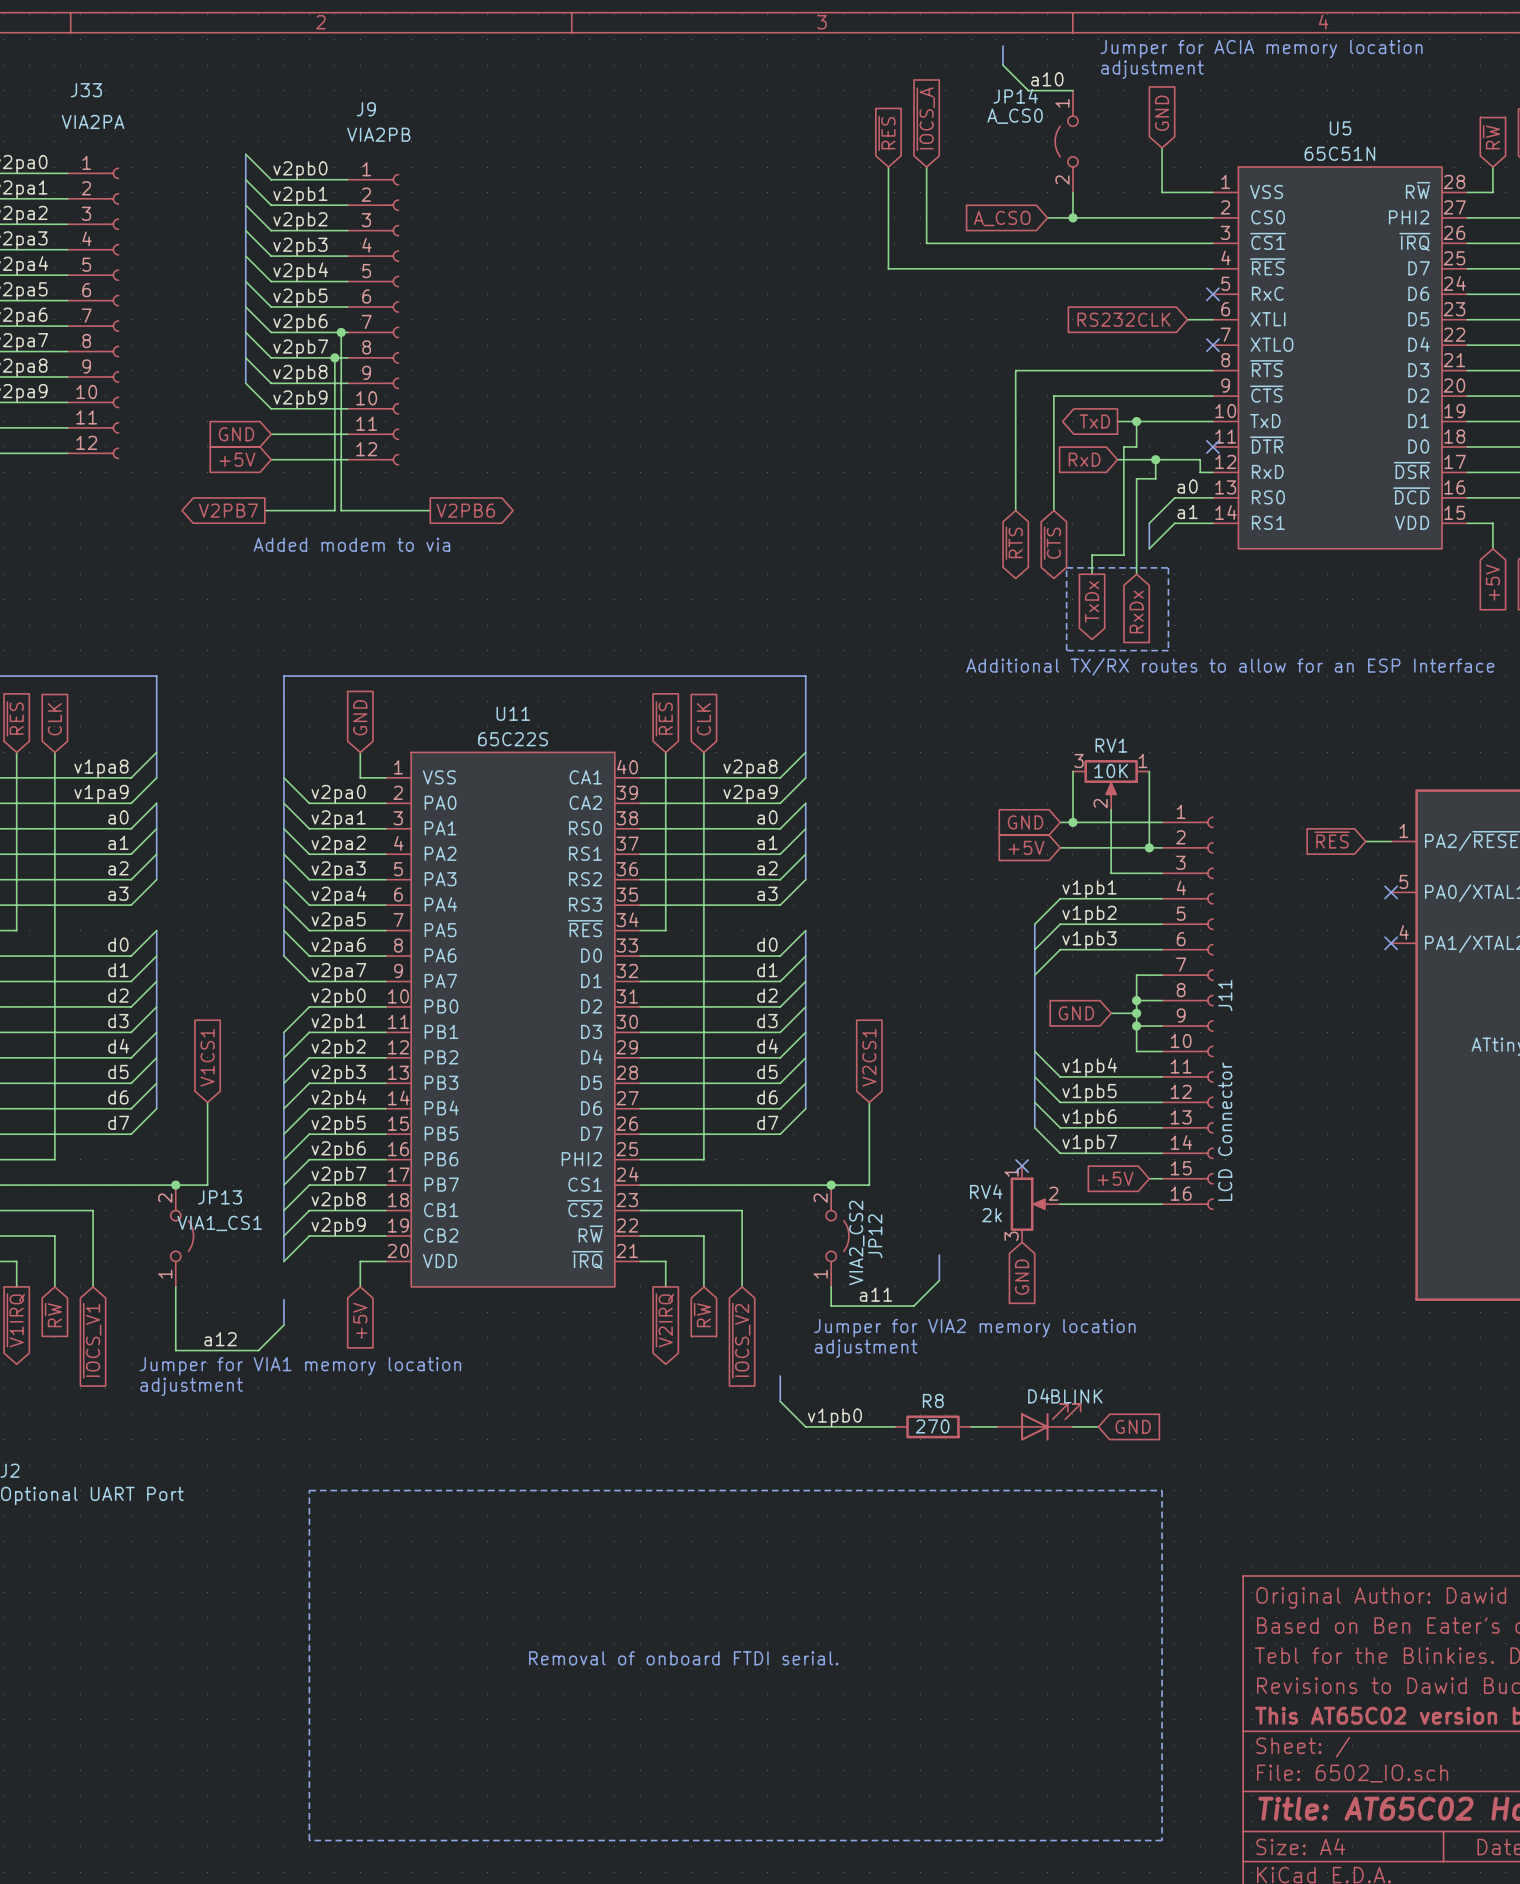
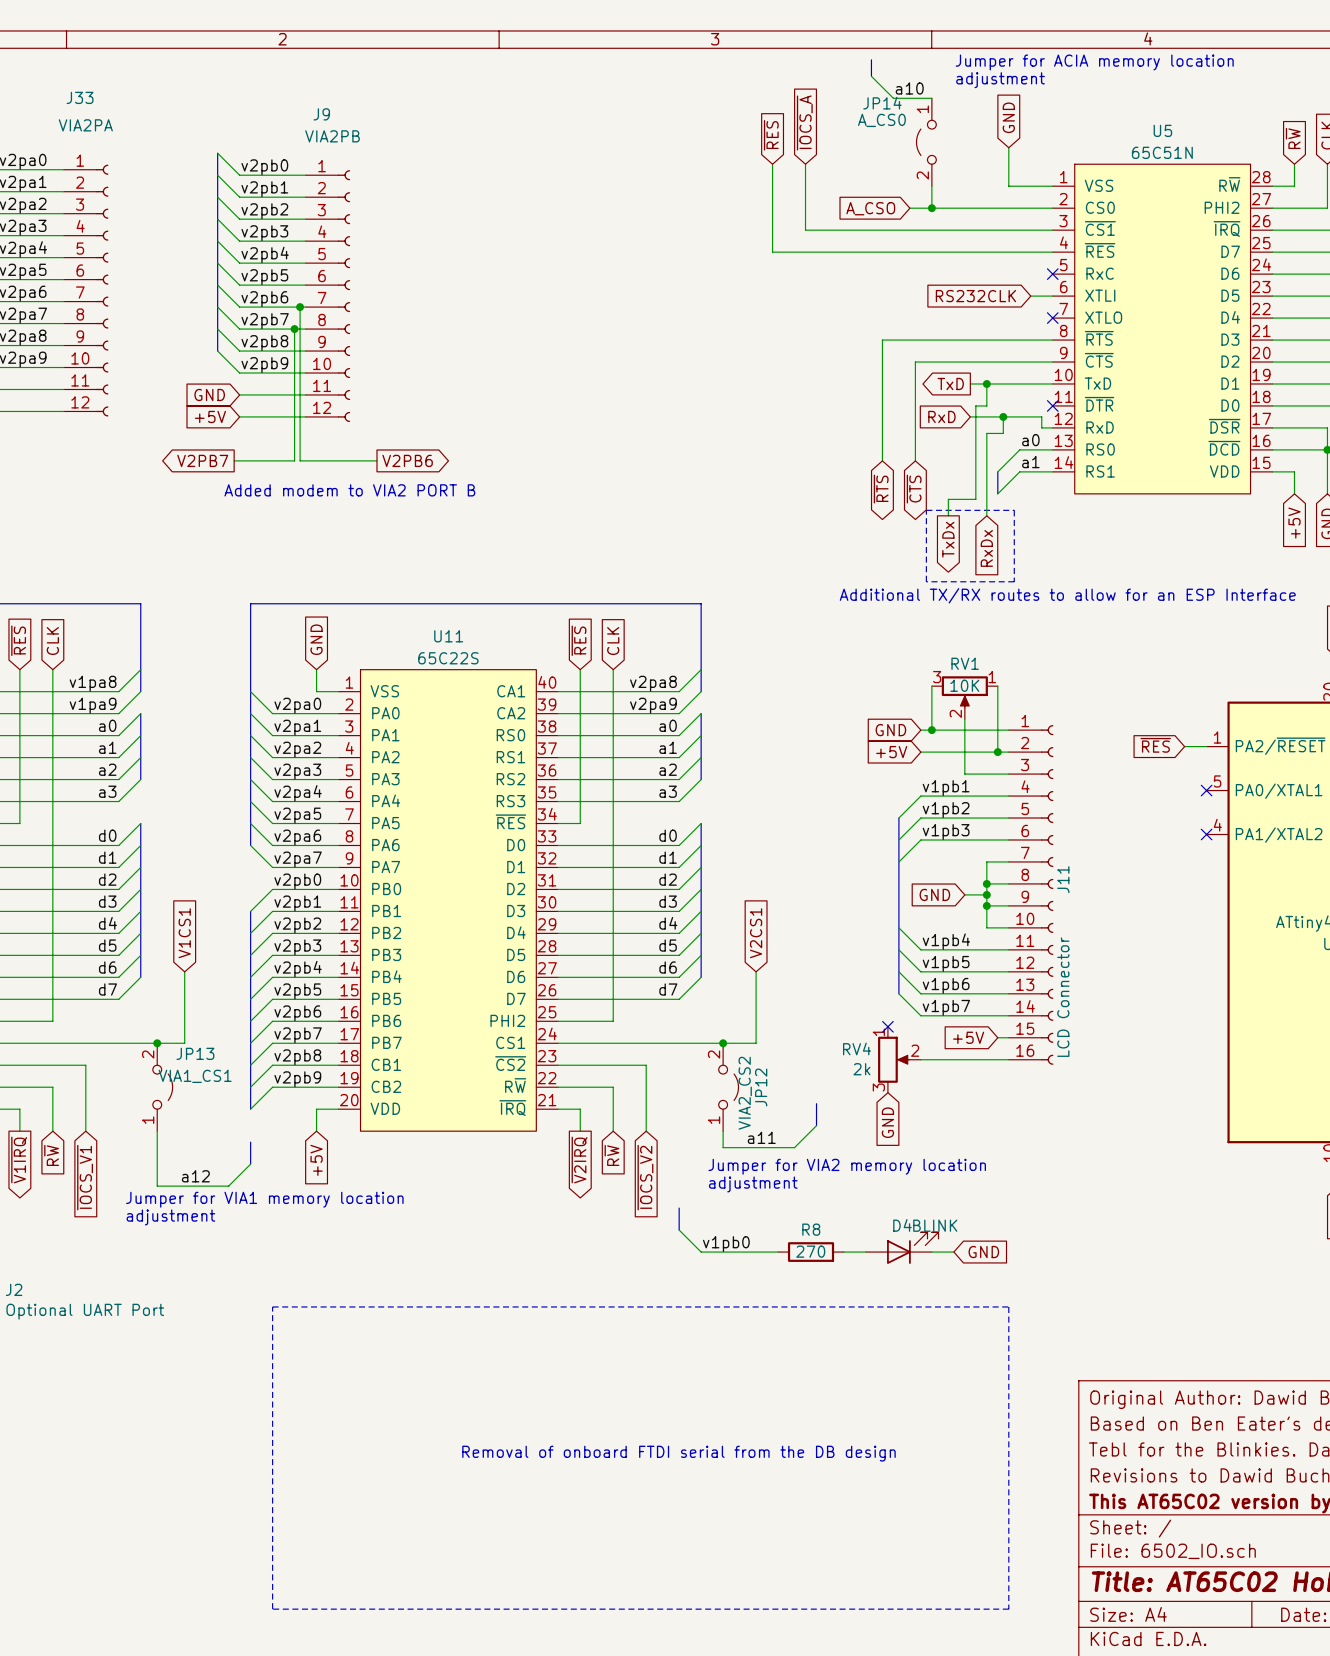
text: Added modem to via (351, 544) -> Added modem to VIA2 PORT B (349, 490)
text: Removal of onboard FTDI serial. (683, 1658) -> Removal of onboard FTDI serial from the DB design (678, 1453)

